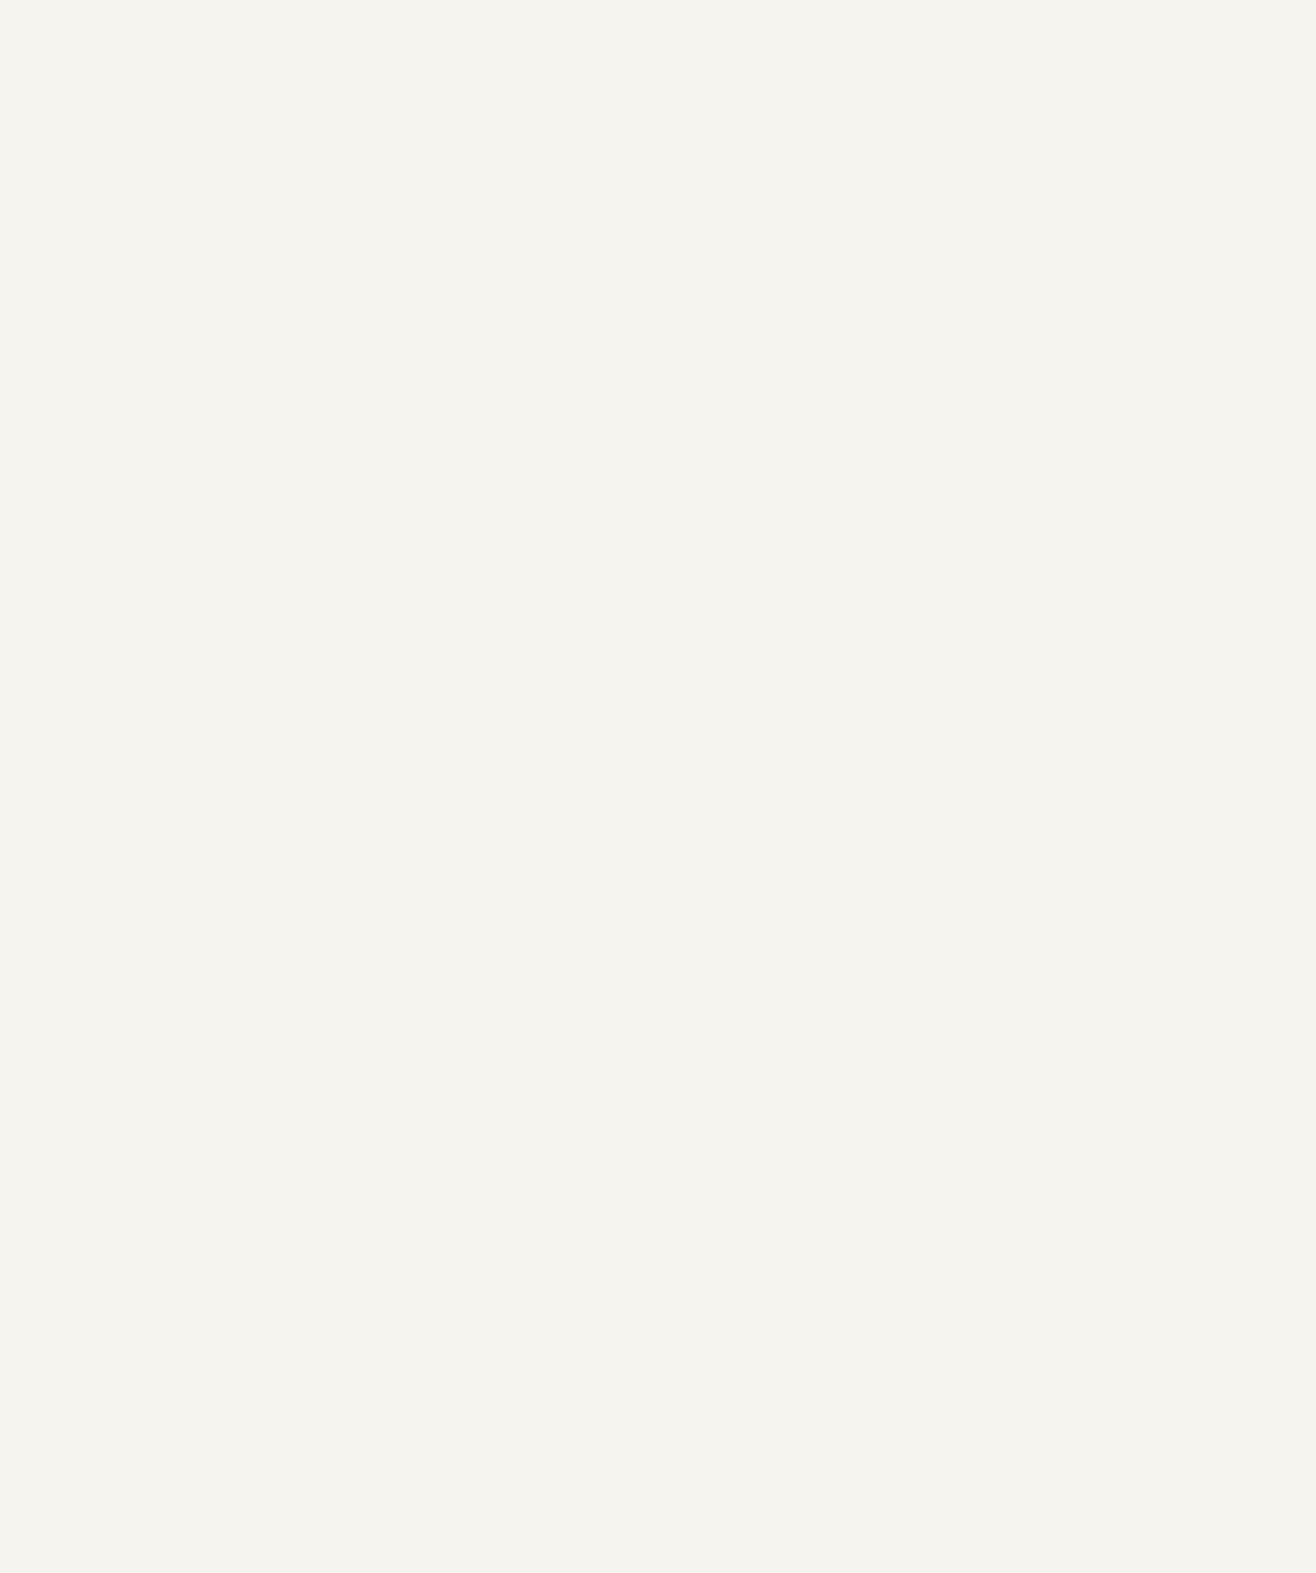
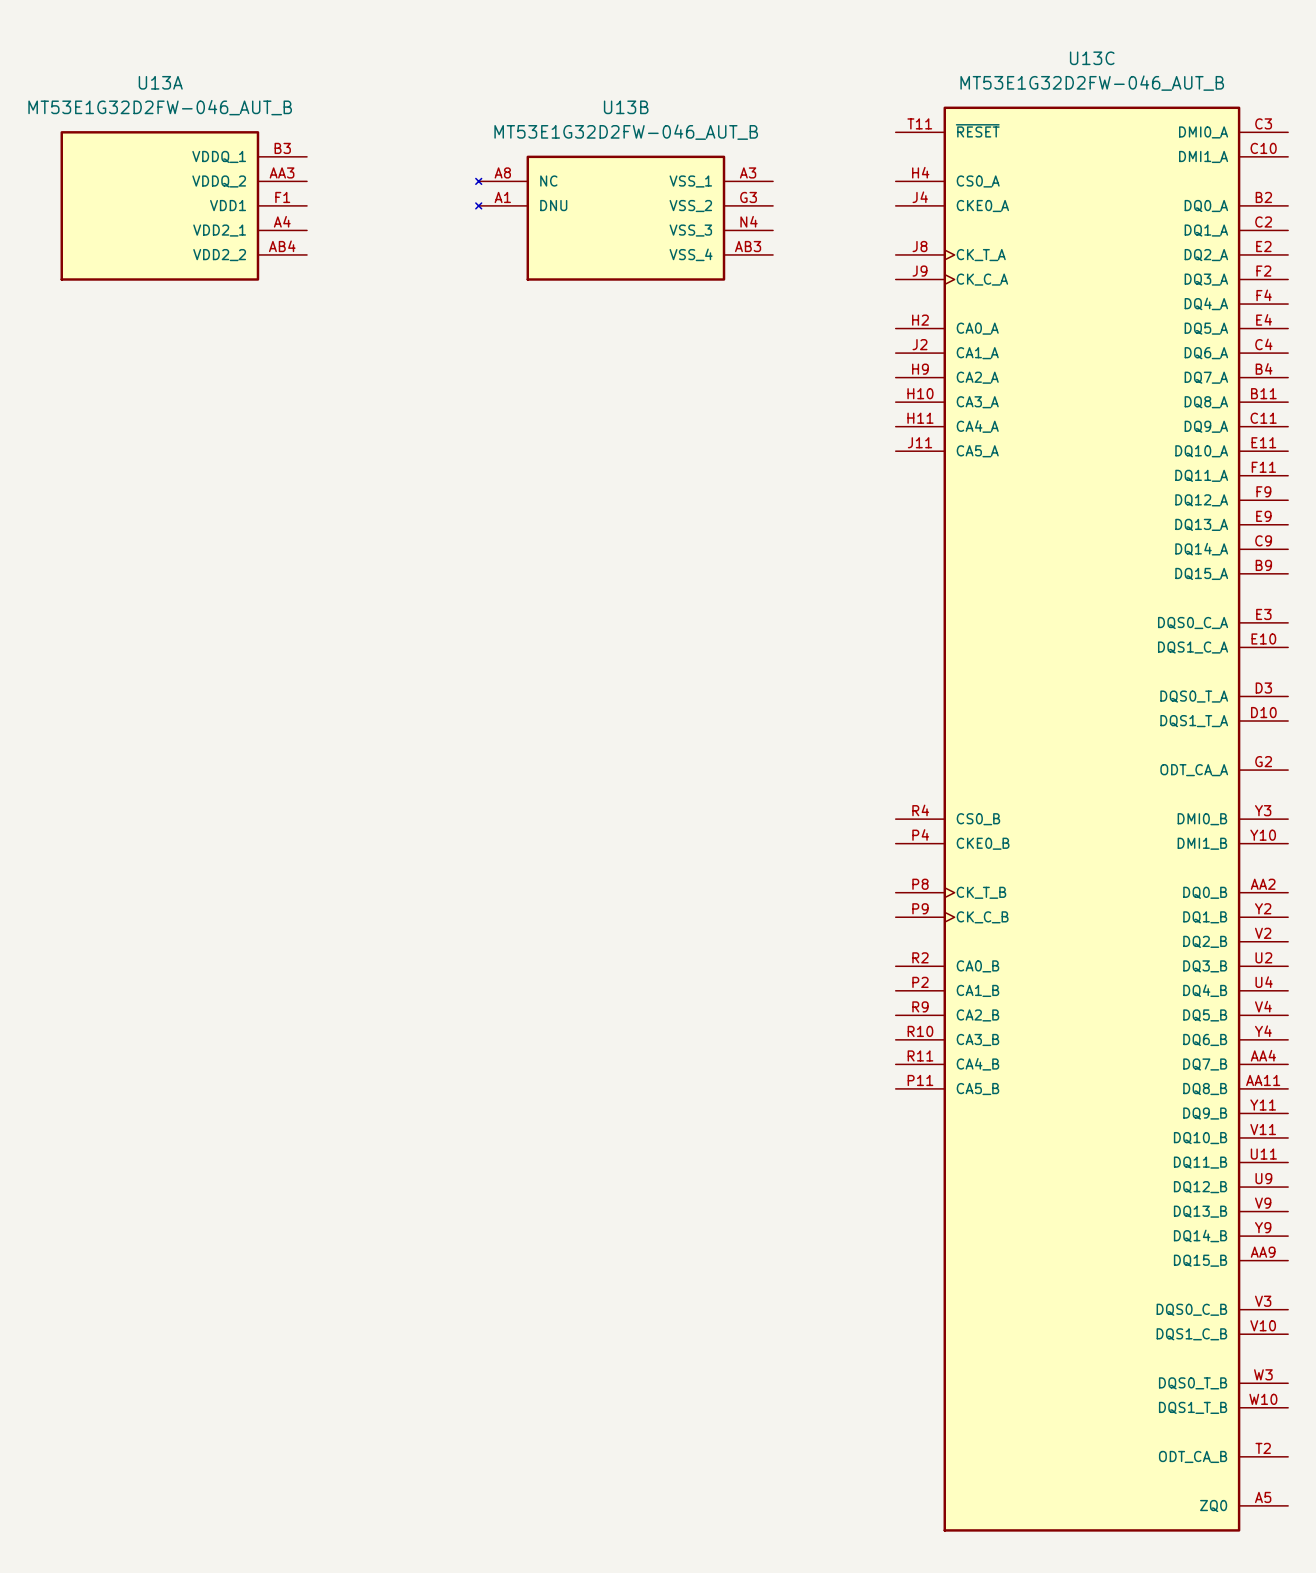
U13A: none -> MT53E1G32D2FW-046_AUT_B (183, 205)
U13B: none -> MT53E1G32D2FW-046_AUT_B (624, 218)
U13C: none -> MT53E1G32D2FW-046_AUT_B (1091, 819)

